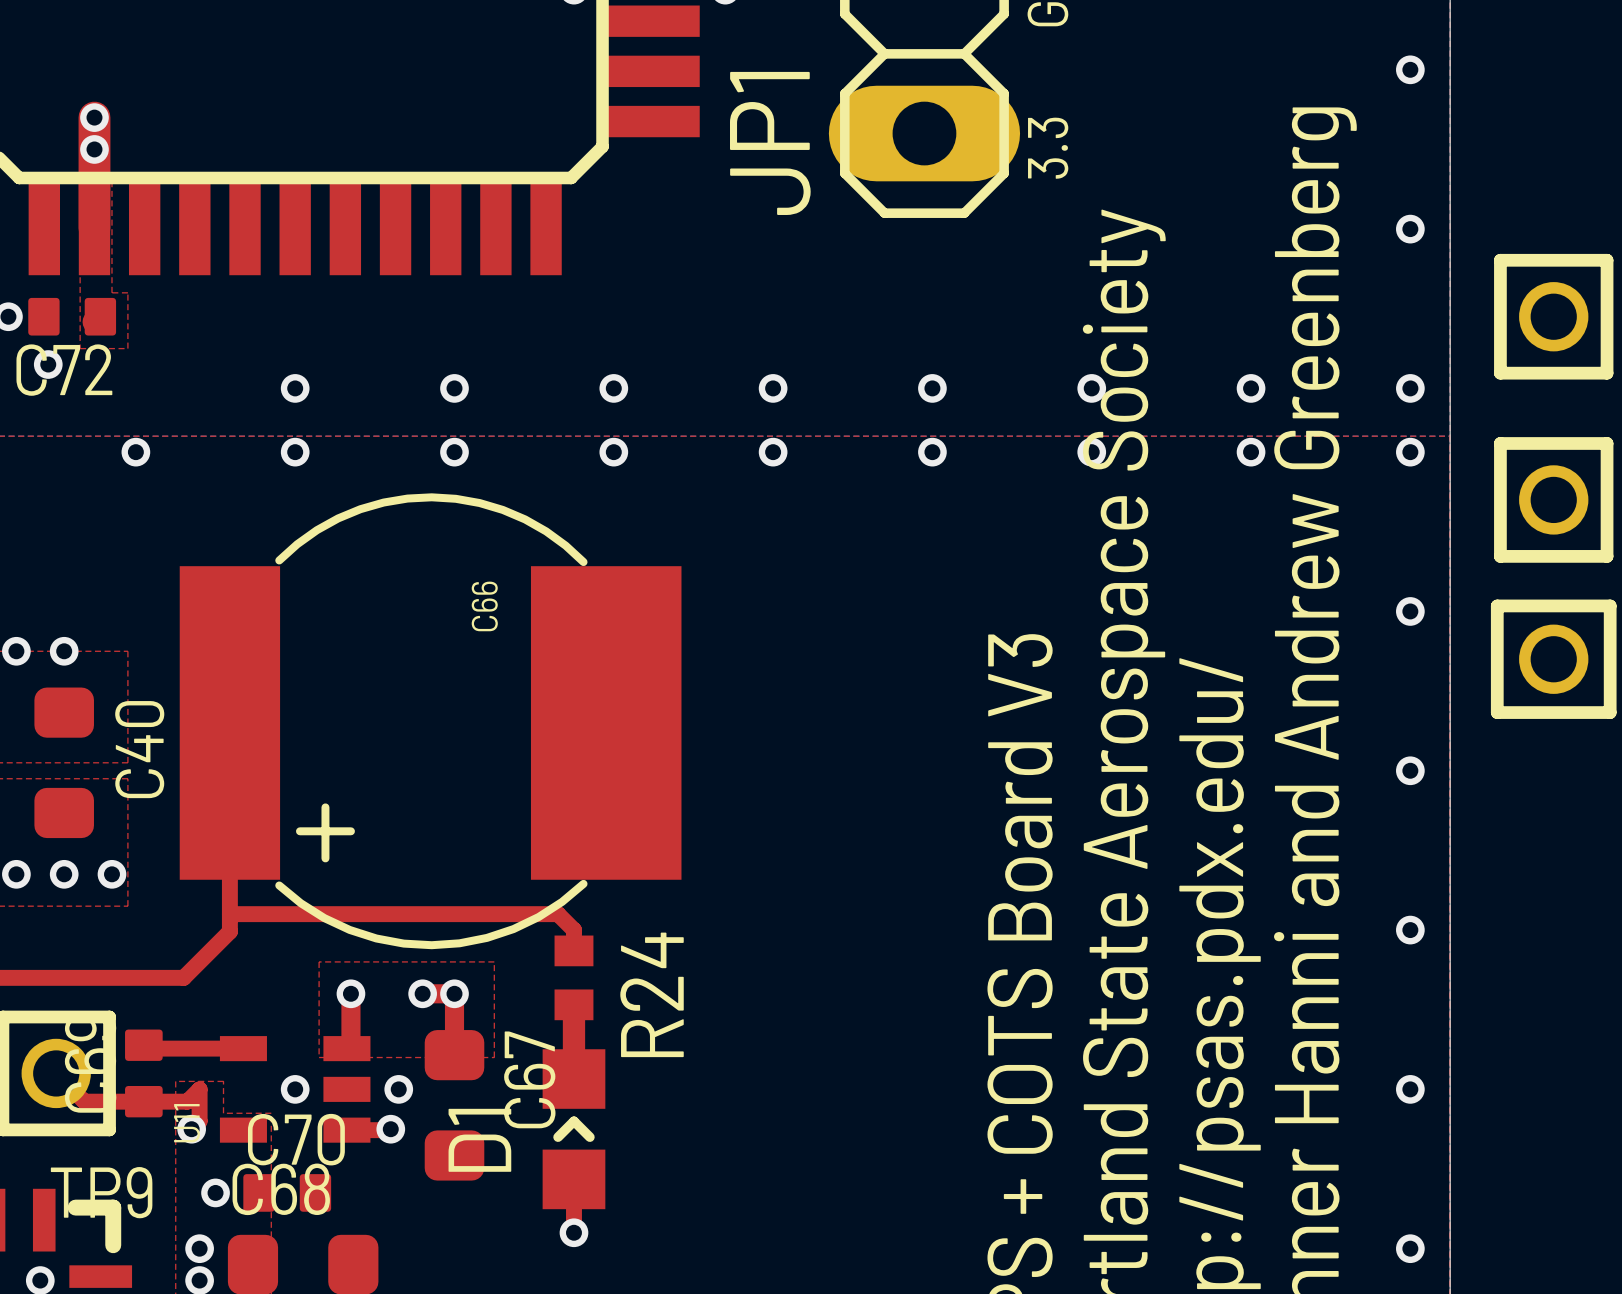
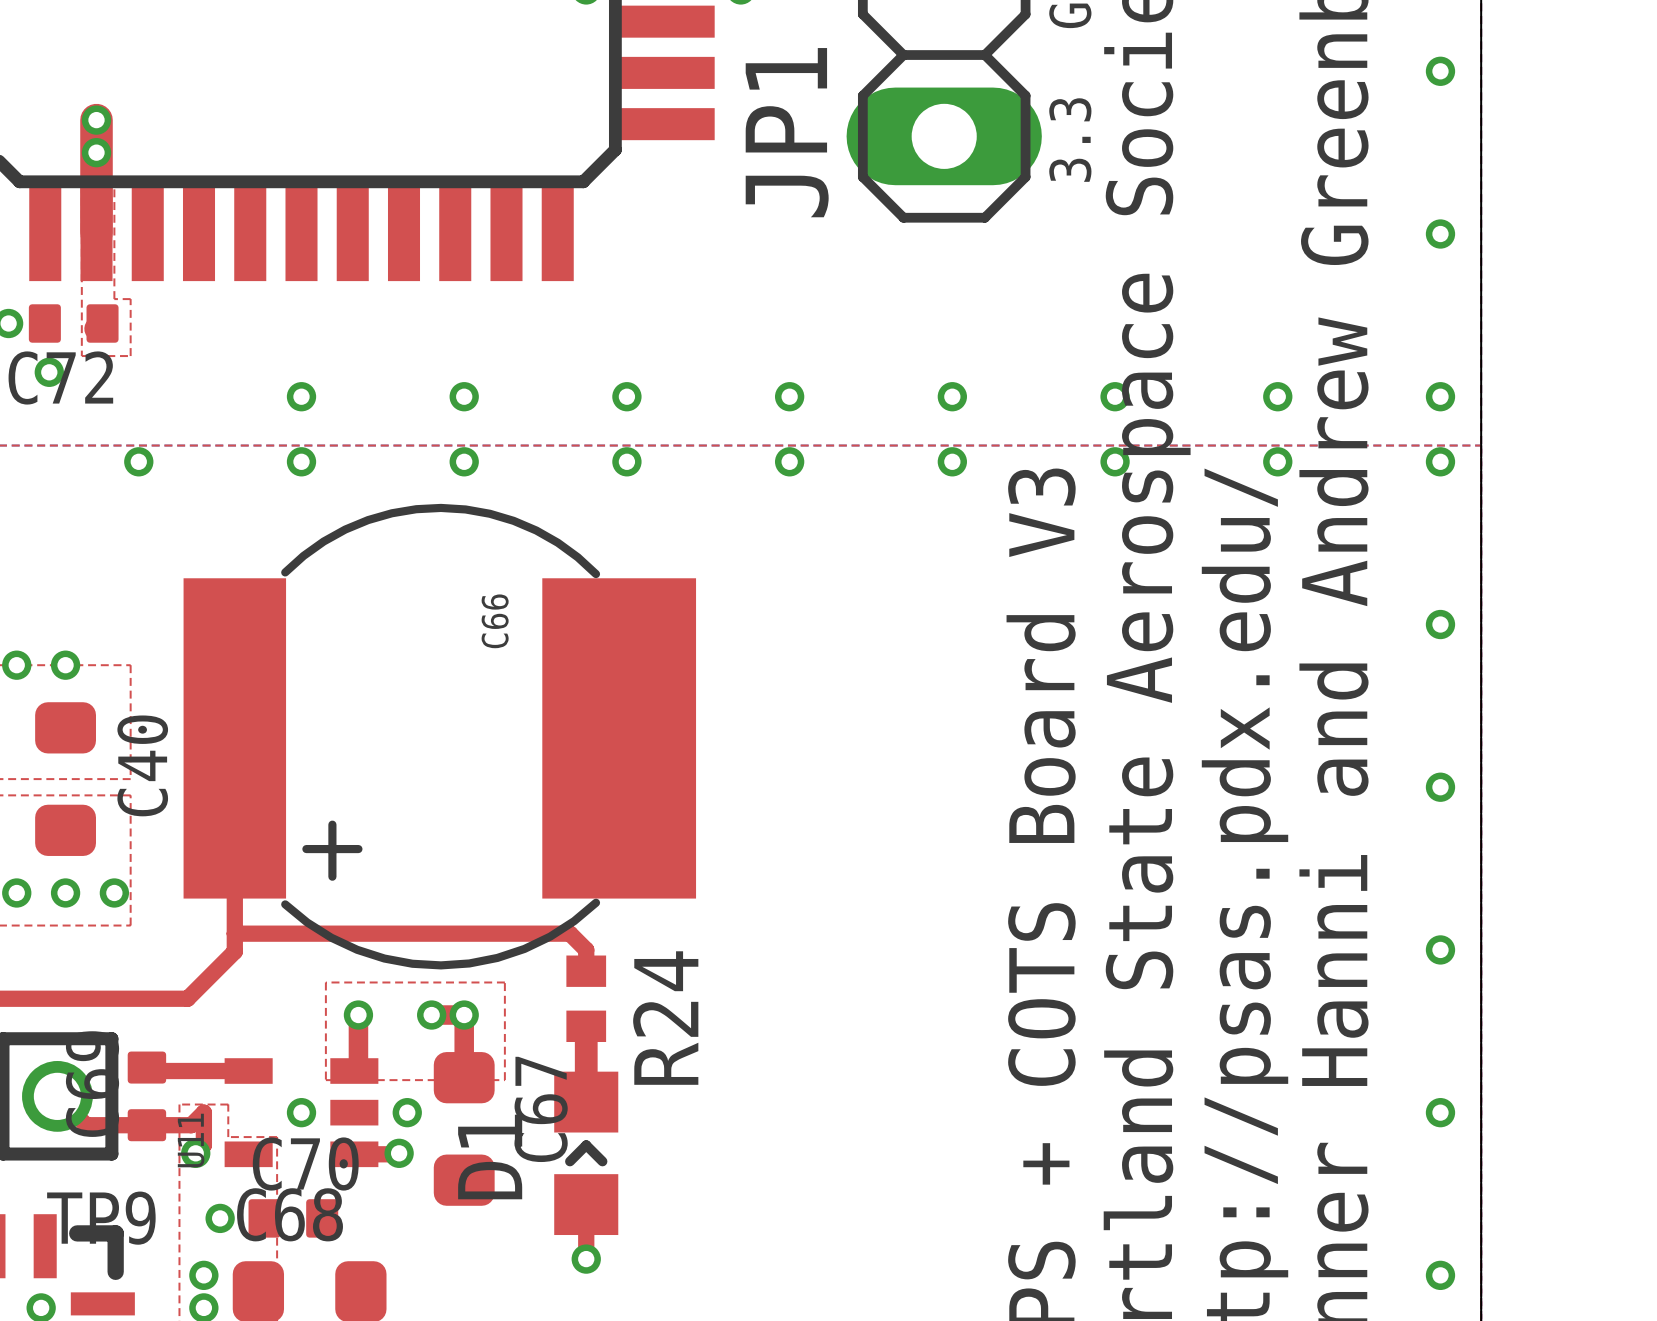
part: (1553, 316) -> none
part: (1553, 499) -> none
part: (1553, 659) -> none

